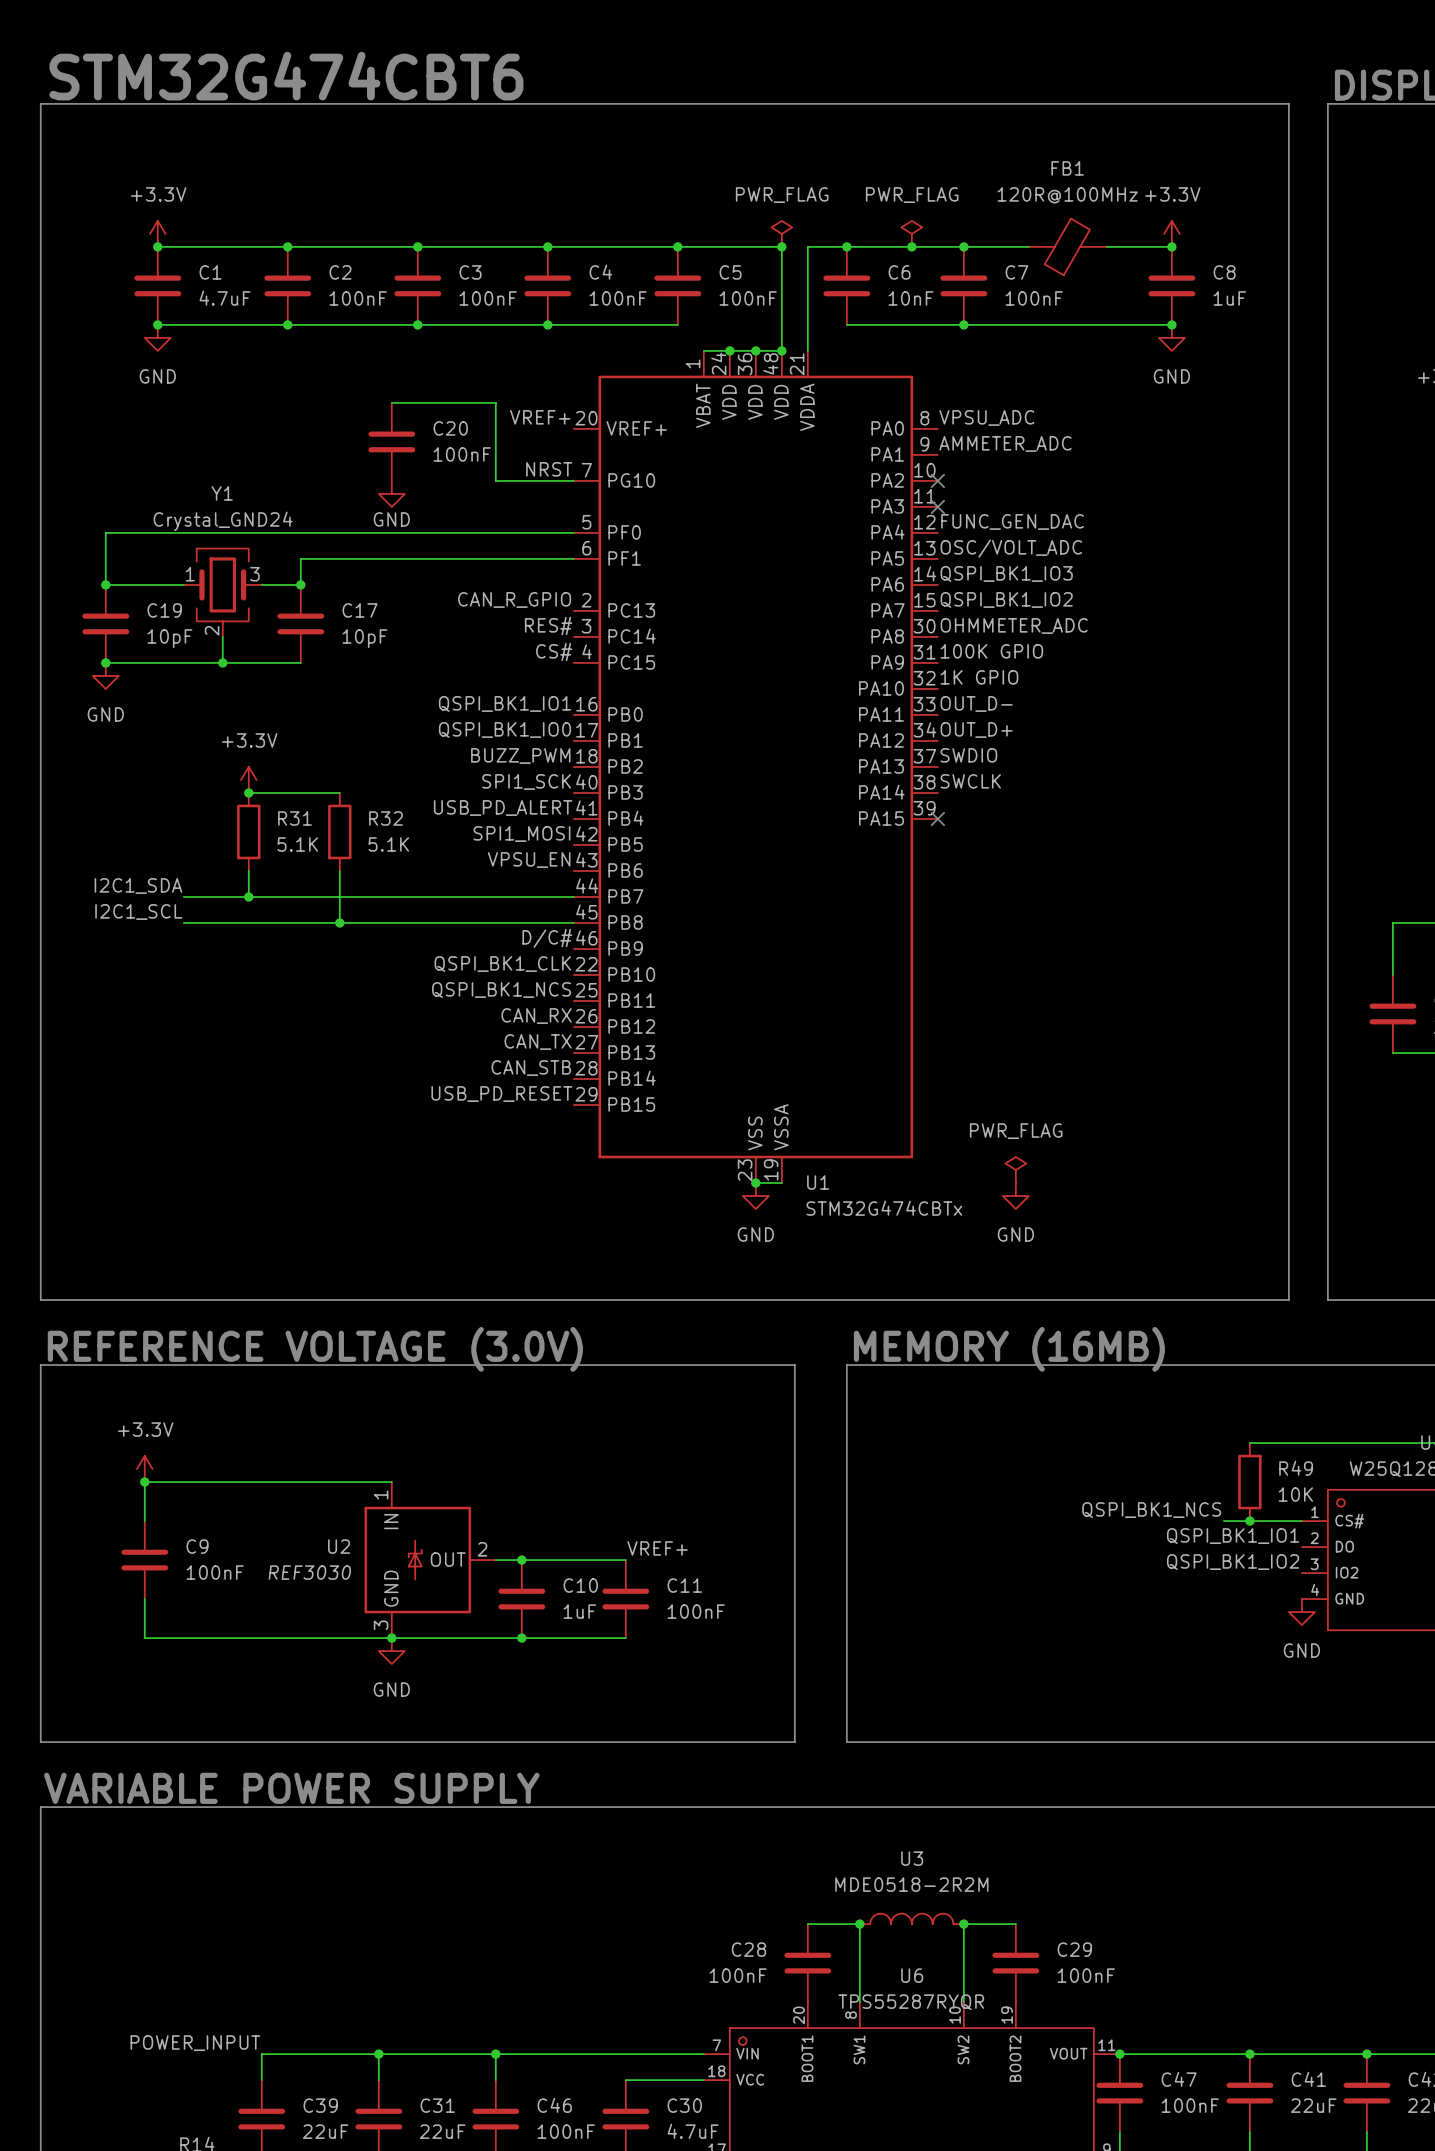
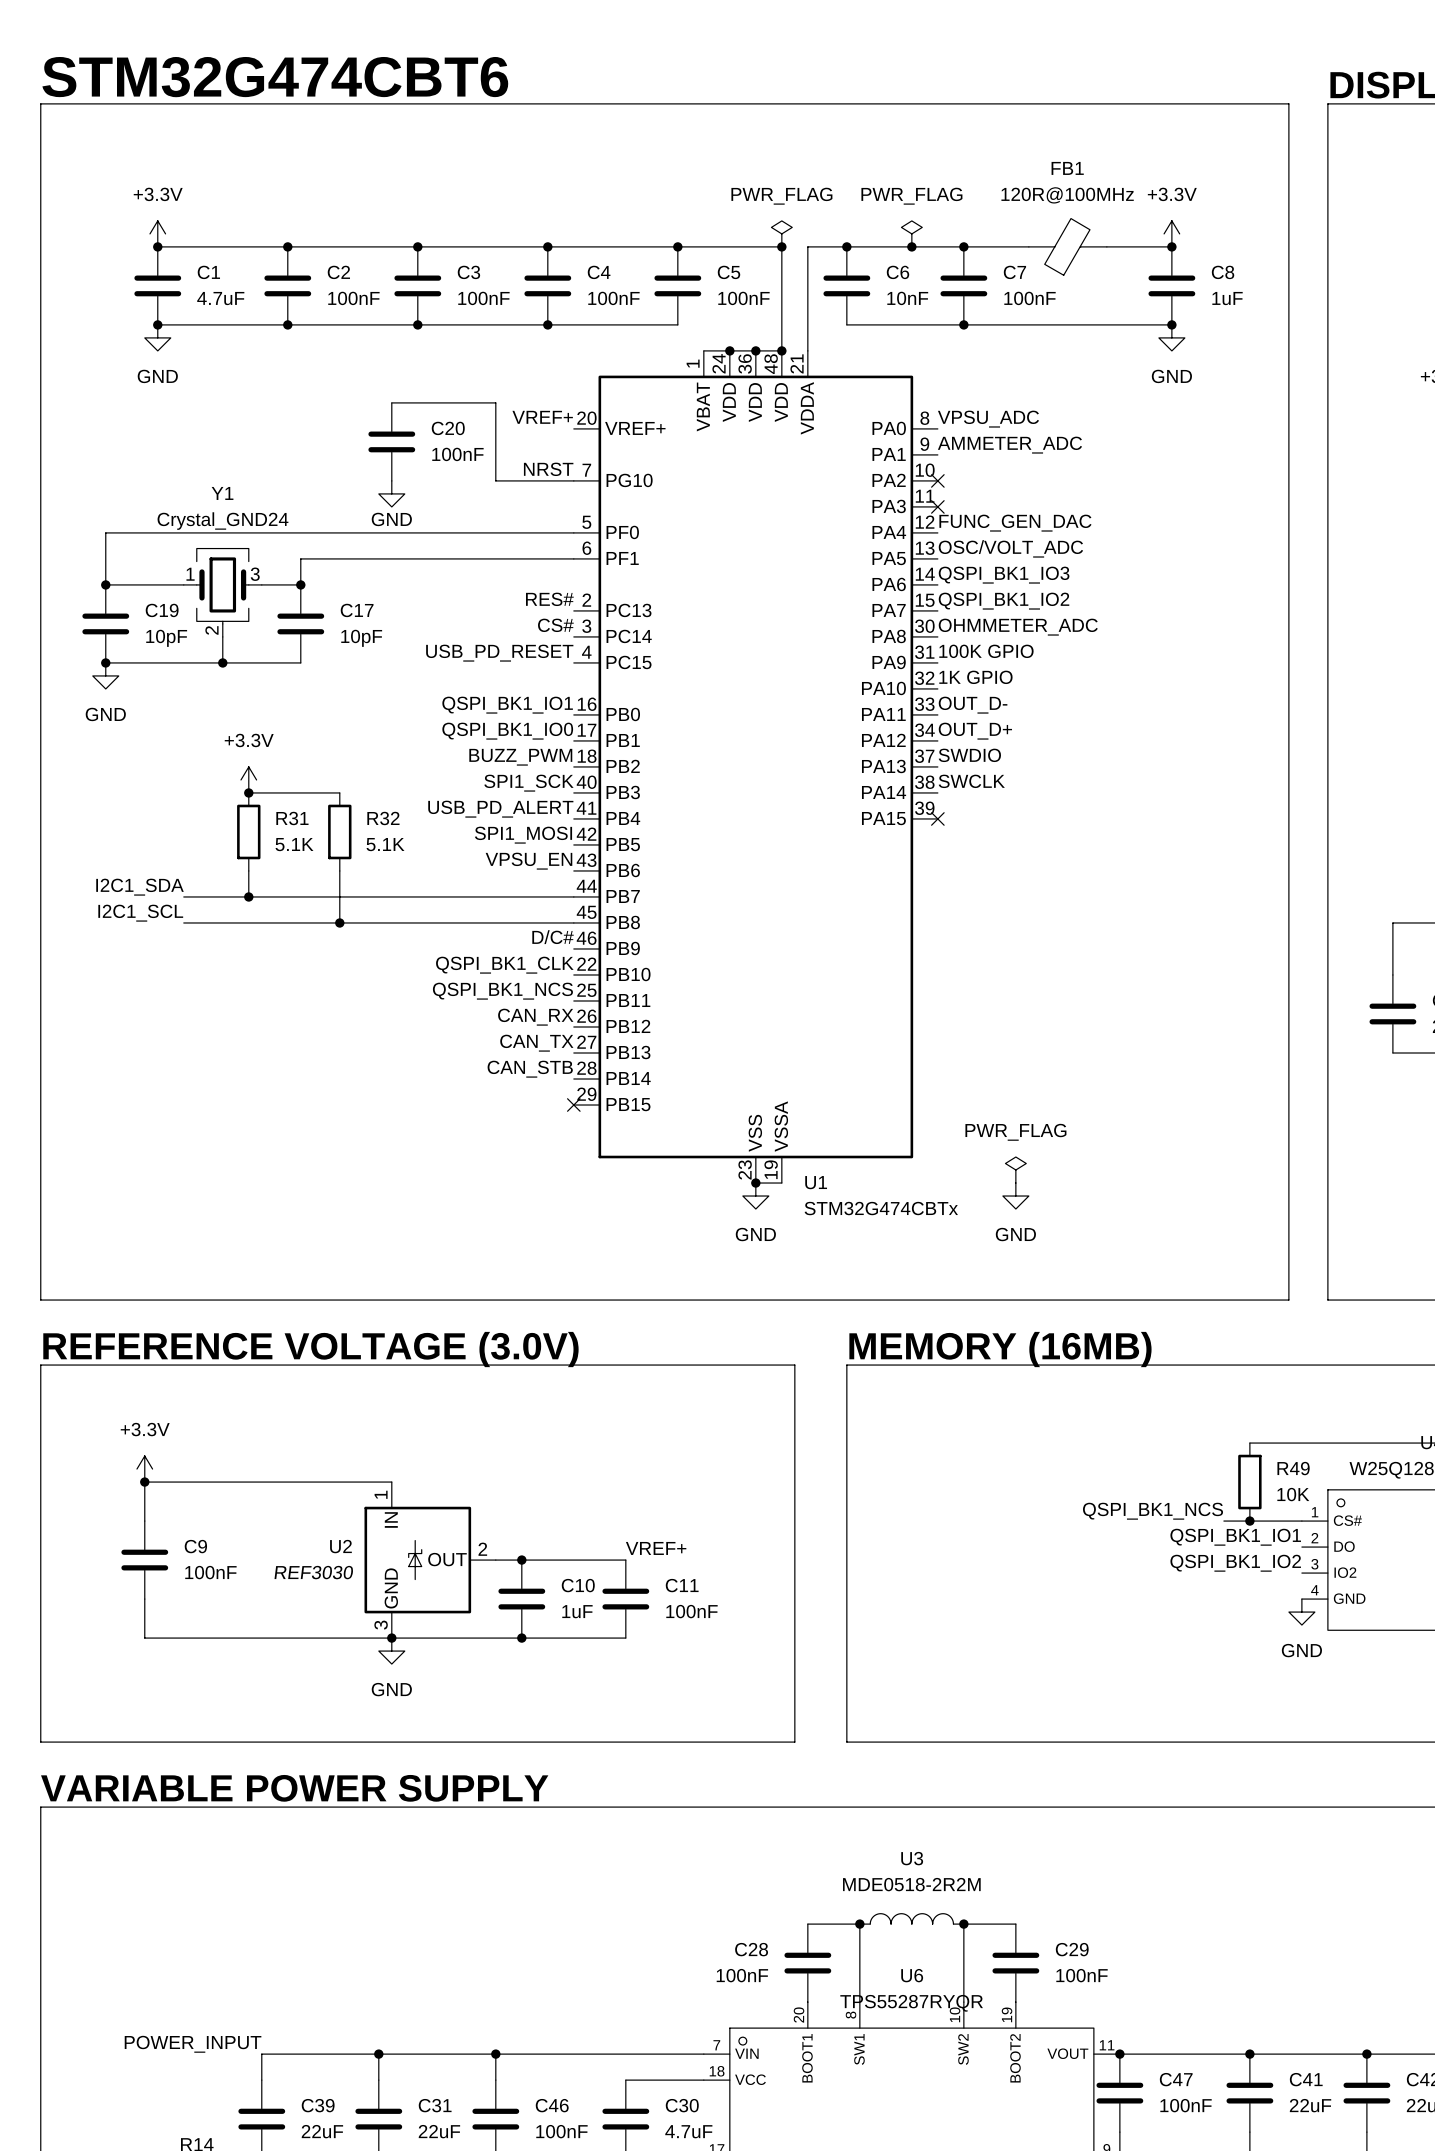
label: CAN_R_GPIO (514, 599) -> RES# (549, 599)
label: RES# (548, 625) -> CS# (555, 625)
label: CS# (554, 651) -> USB_PD_RESET (499, 653)
label: USB_PD_RESET (501, 1094) -> none
no-connect mark: none -> (573, 1105)

